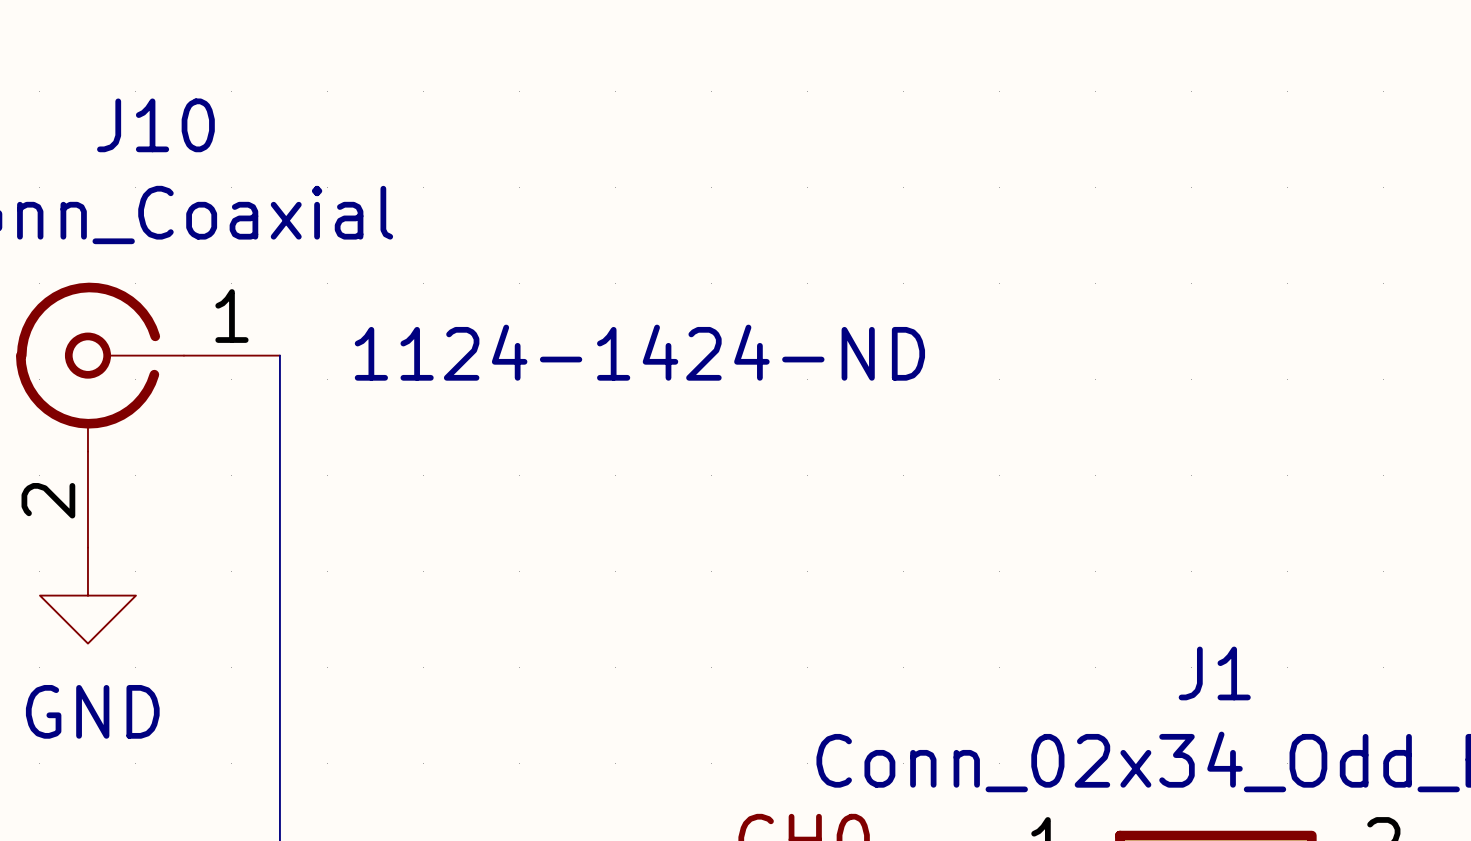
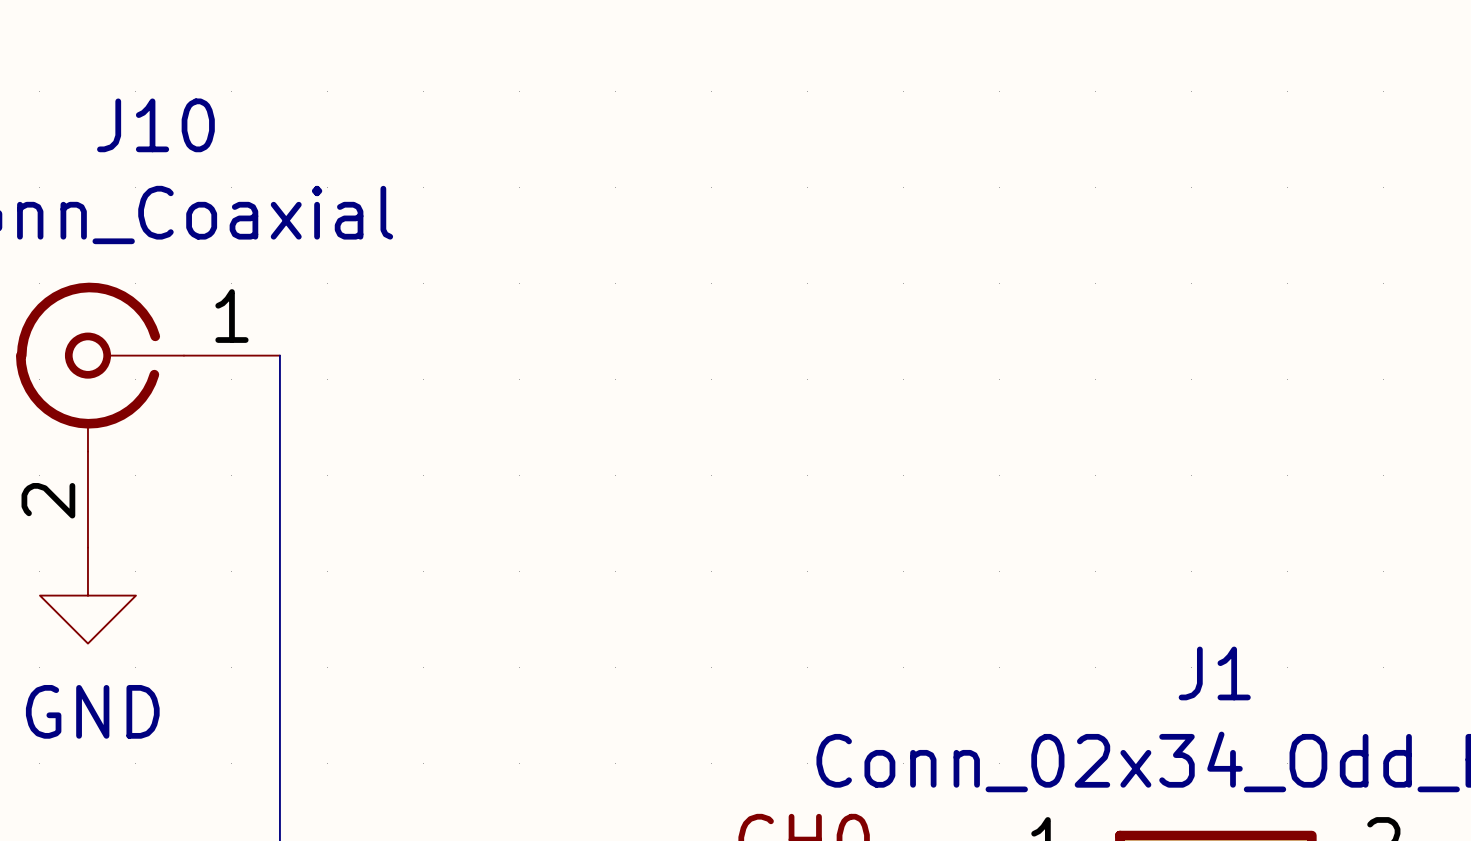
J10 text: 1124-1424-ND (639, 352) -> none

